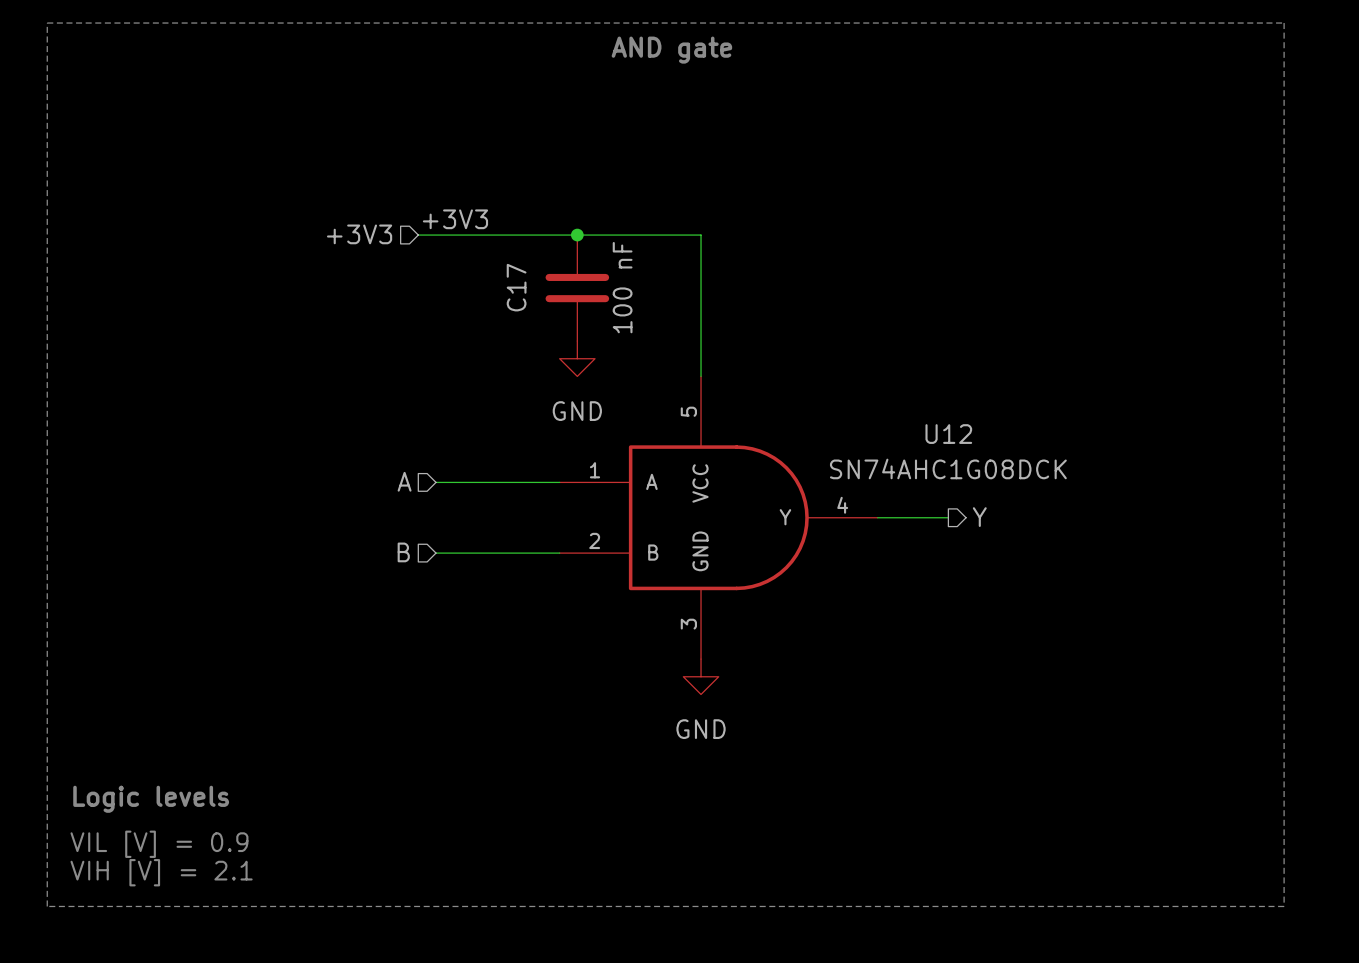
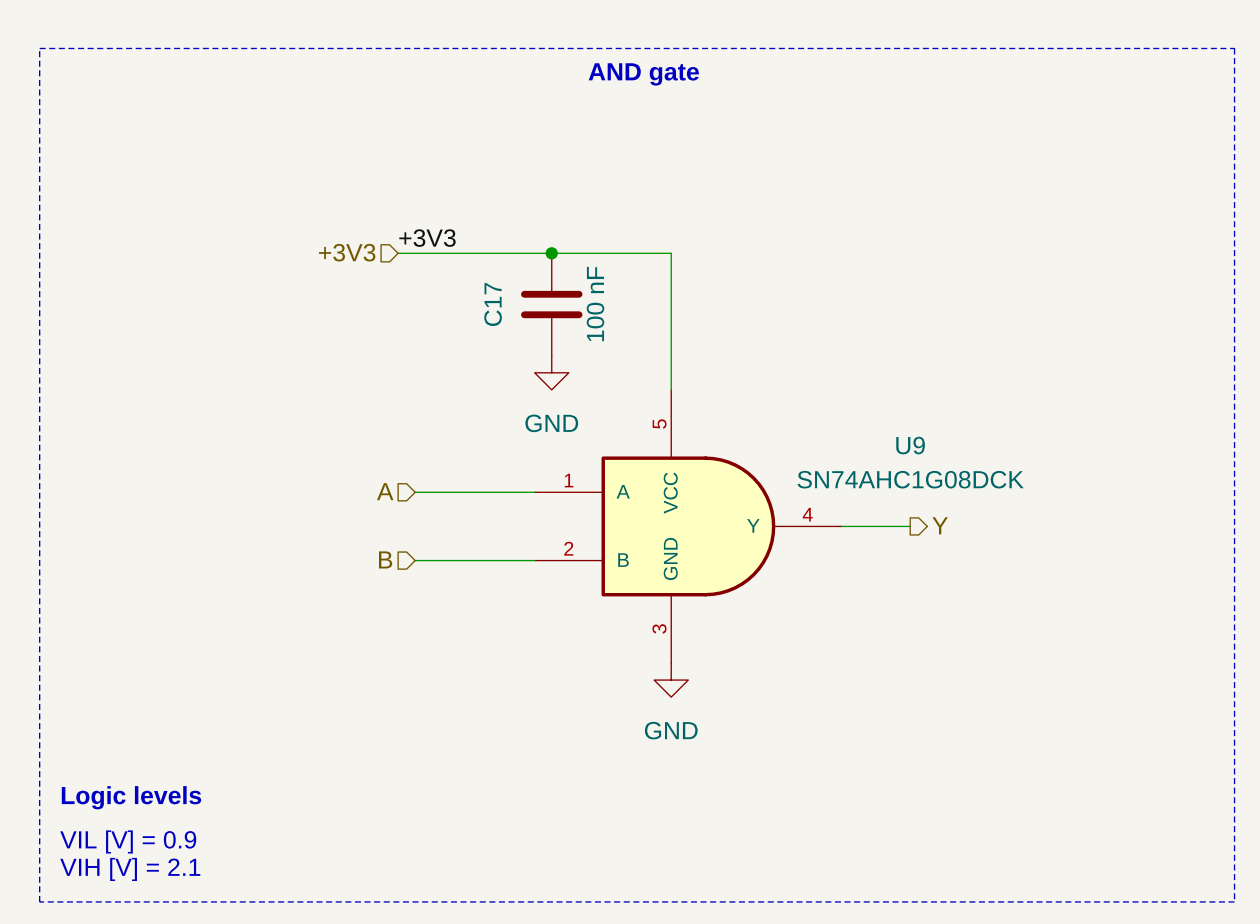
U12 name: U12 (948, 434) -> U9 (910, 445)

